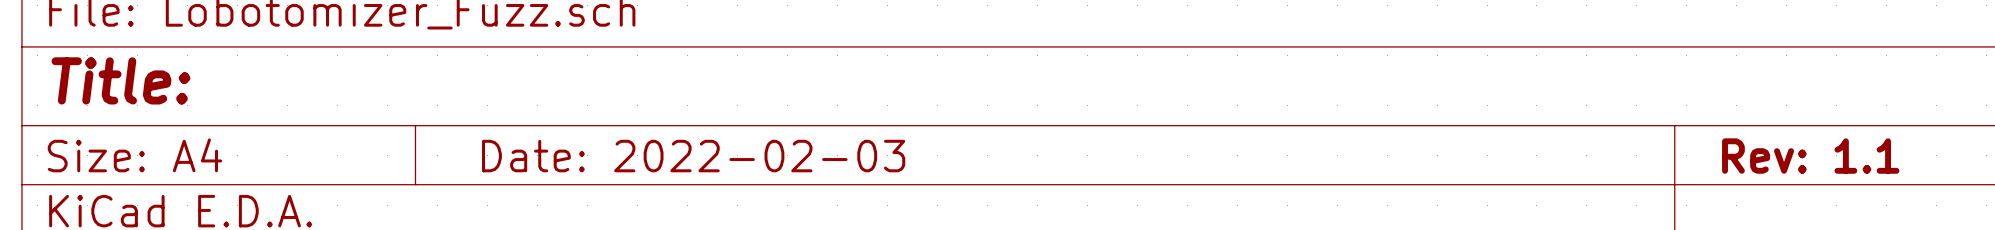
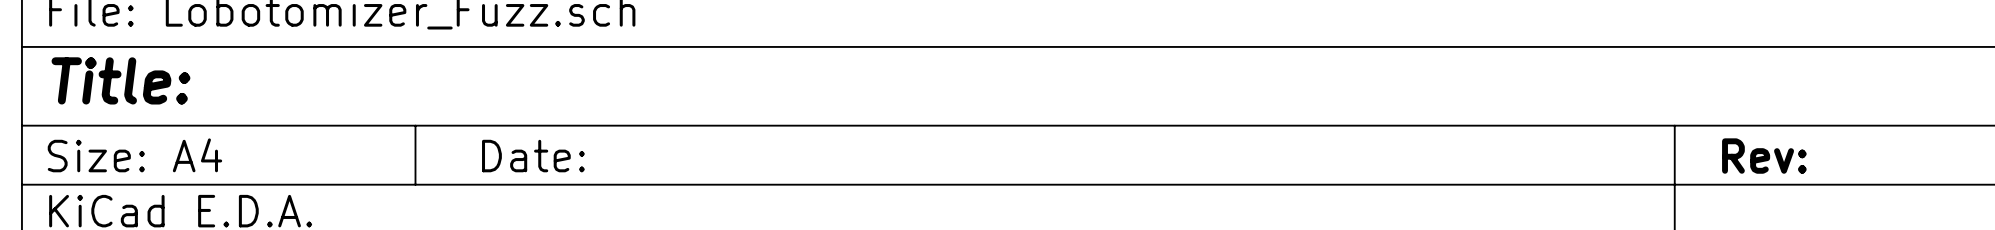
title block: Date: 2022-02-03 (693, 156) -> Date: (533, 156)
title block: Rev: 1.1 (1810, 156) -> Rev: (1764, 156)

